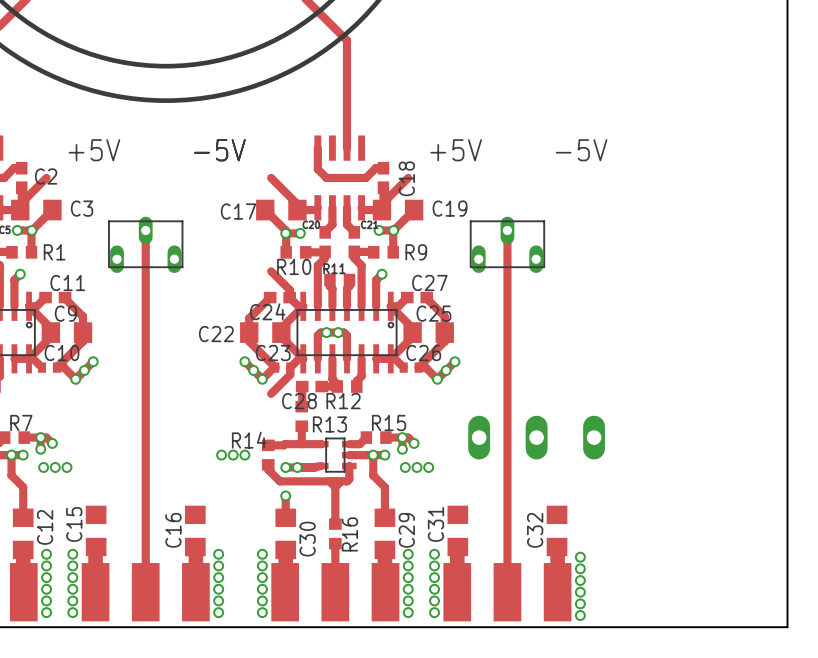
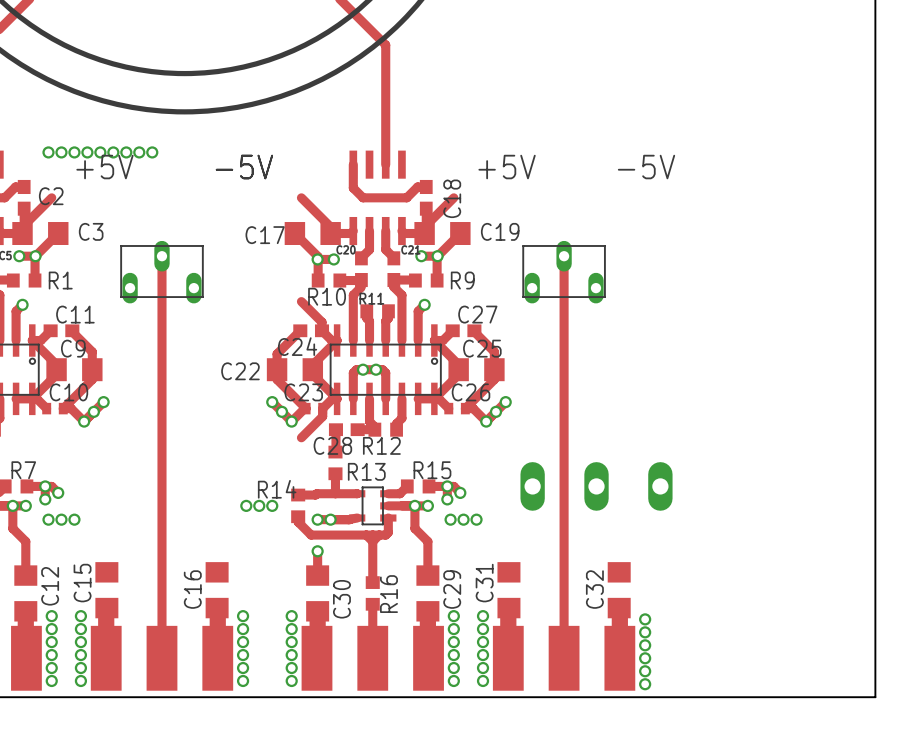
via: none -> (48, 152)
via: none -> (61, 152)
via: none -> (74, 152)
via: none -> (87, 152)
via: none -> (100, 152)
via: none -> (113, 152)
via: none -> (126, 152)
via: none -> (139, 152)
via: none -> (152, 152)

